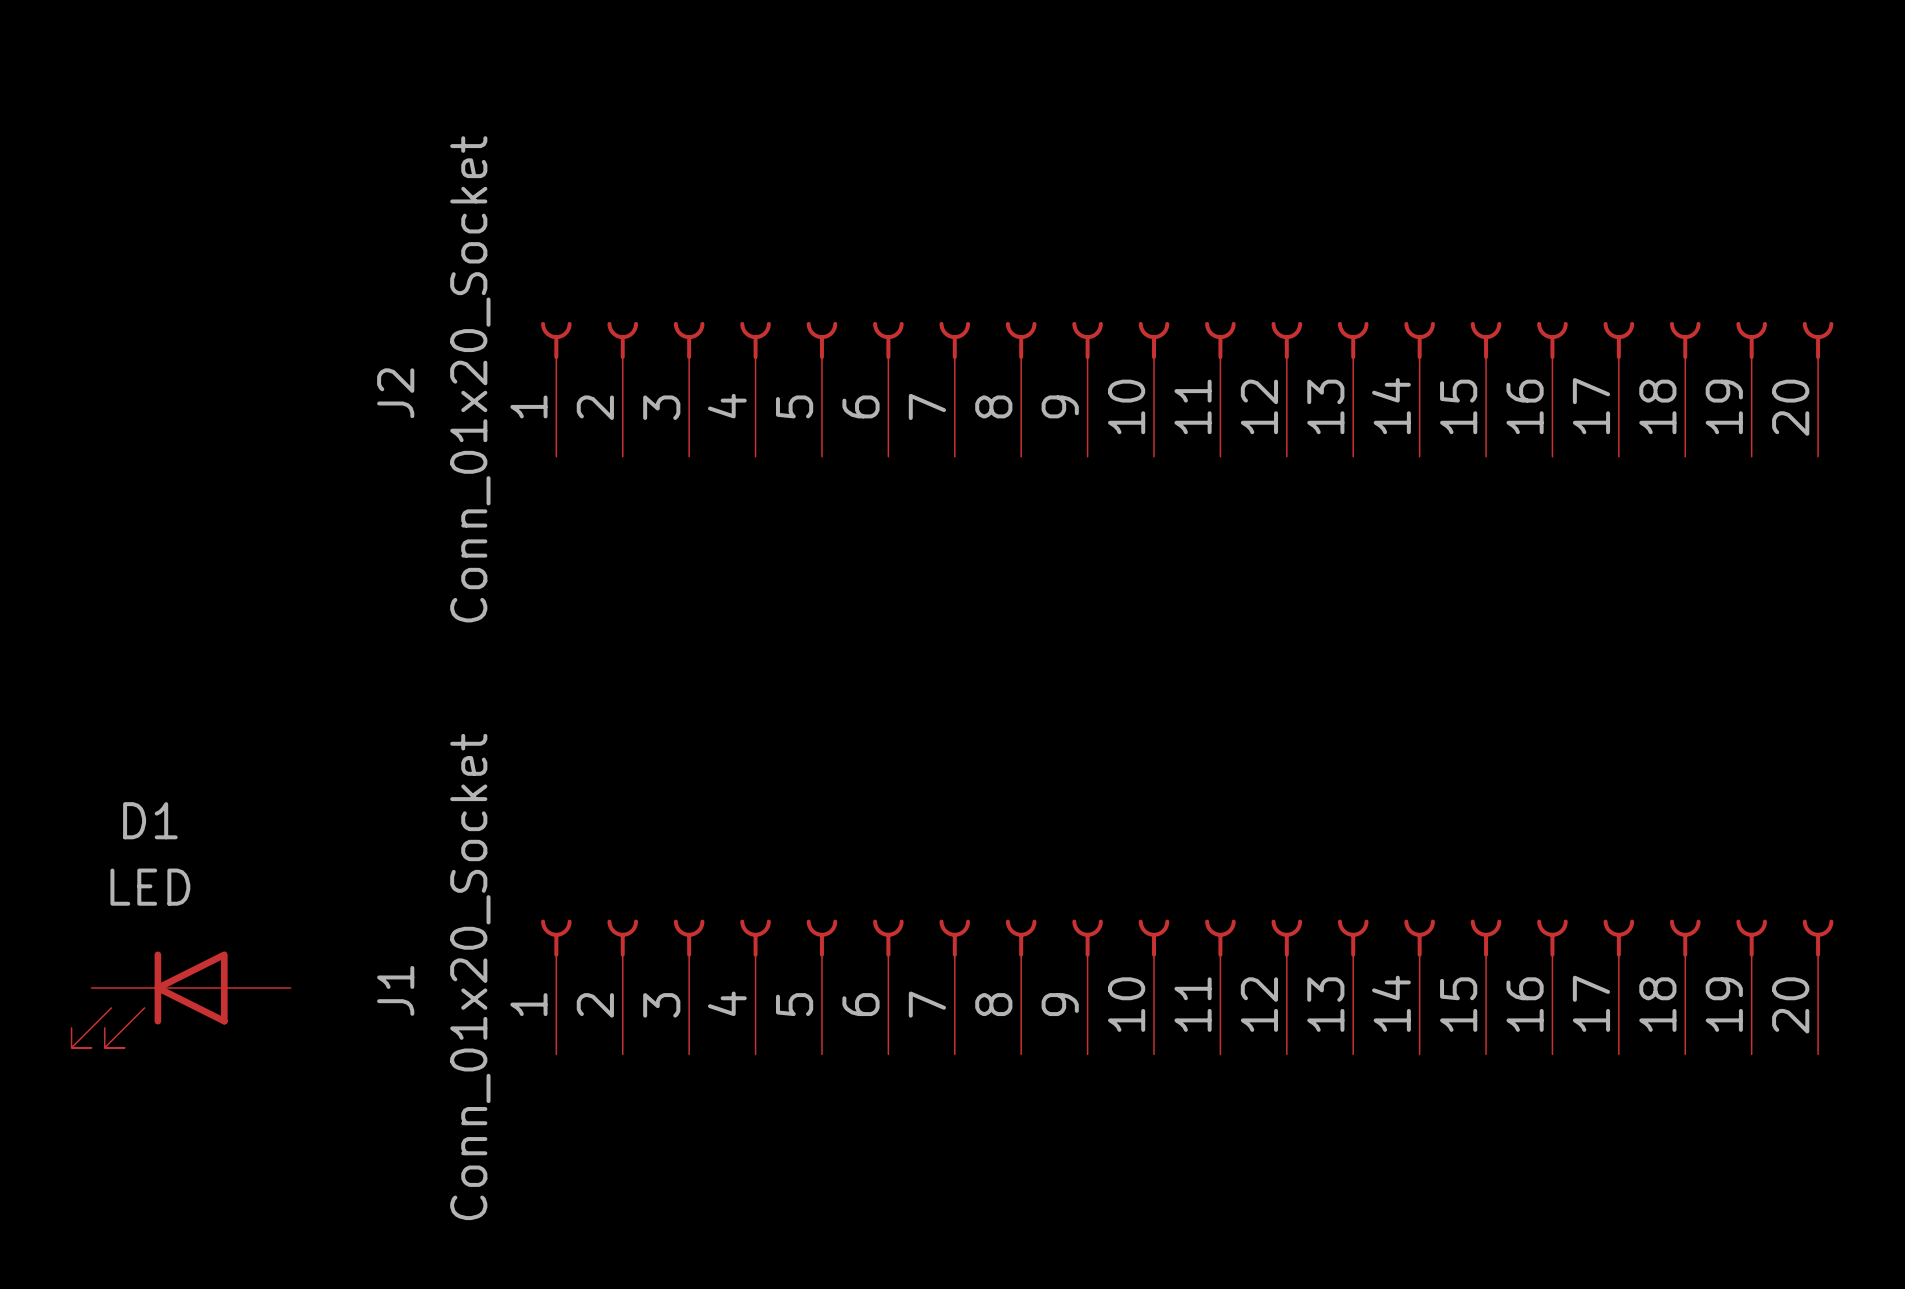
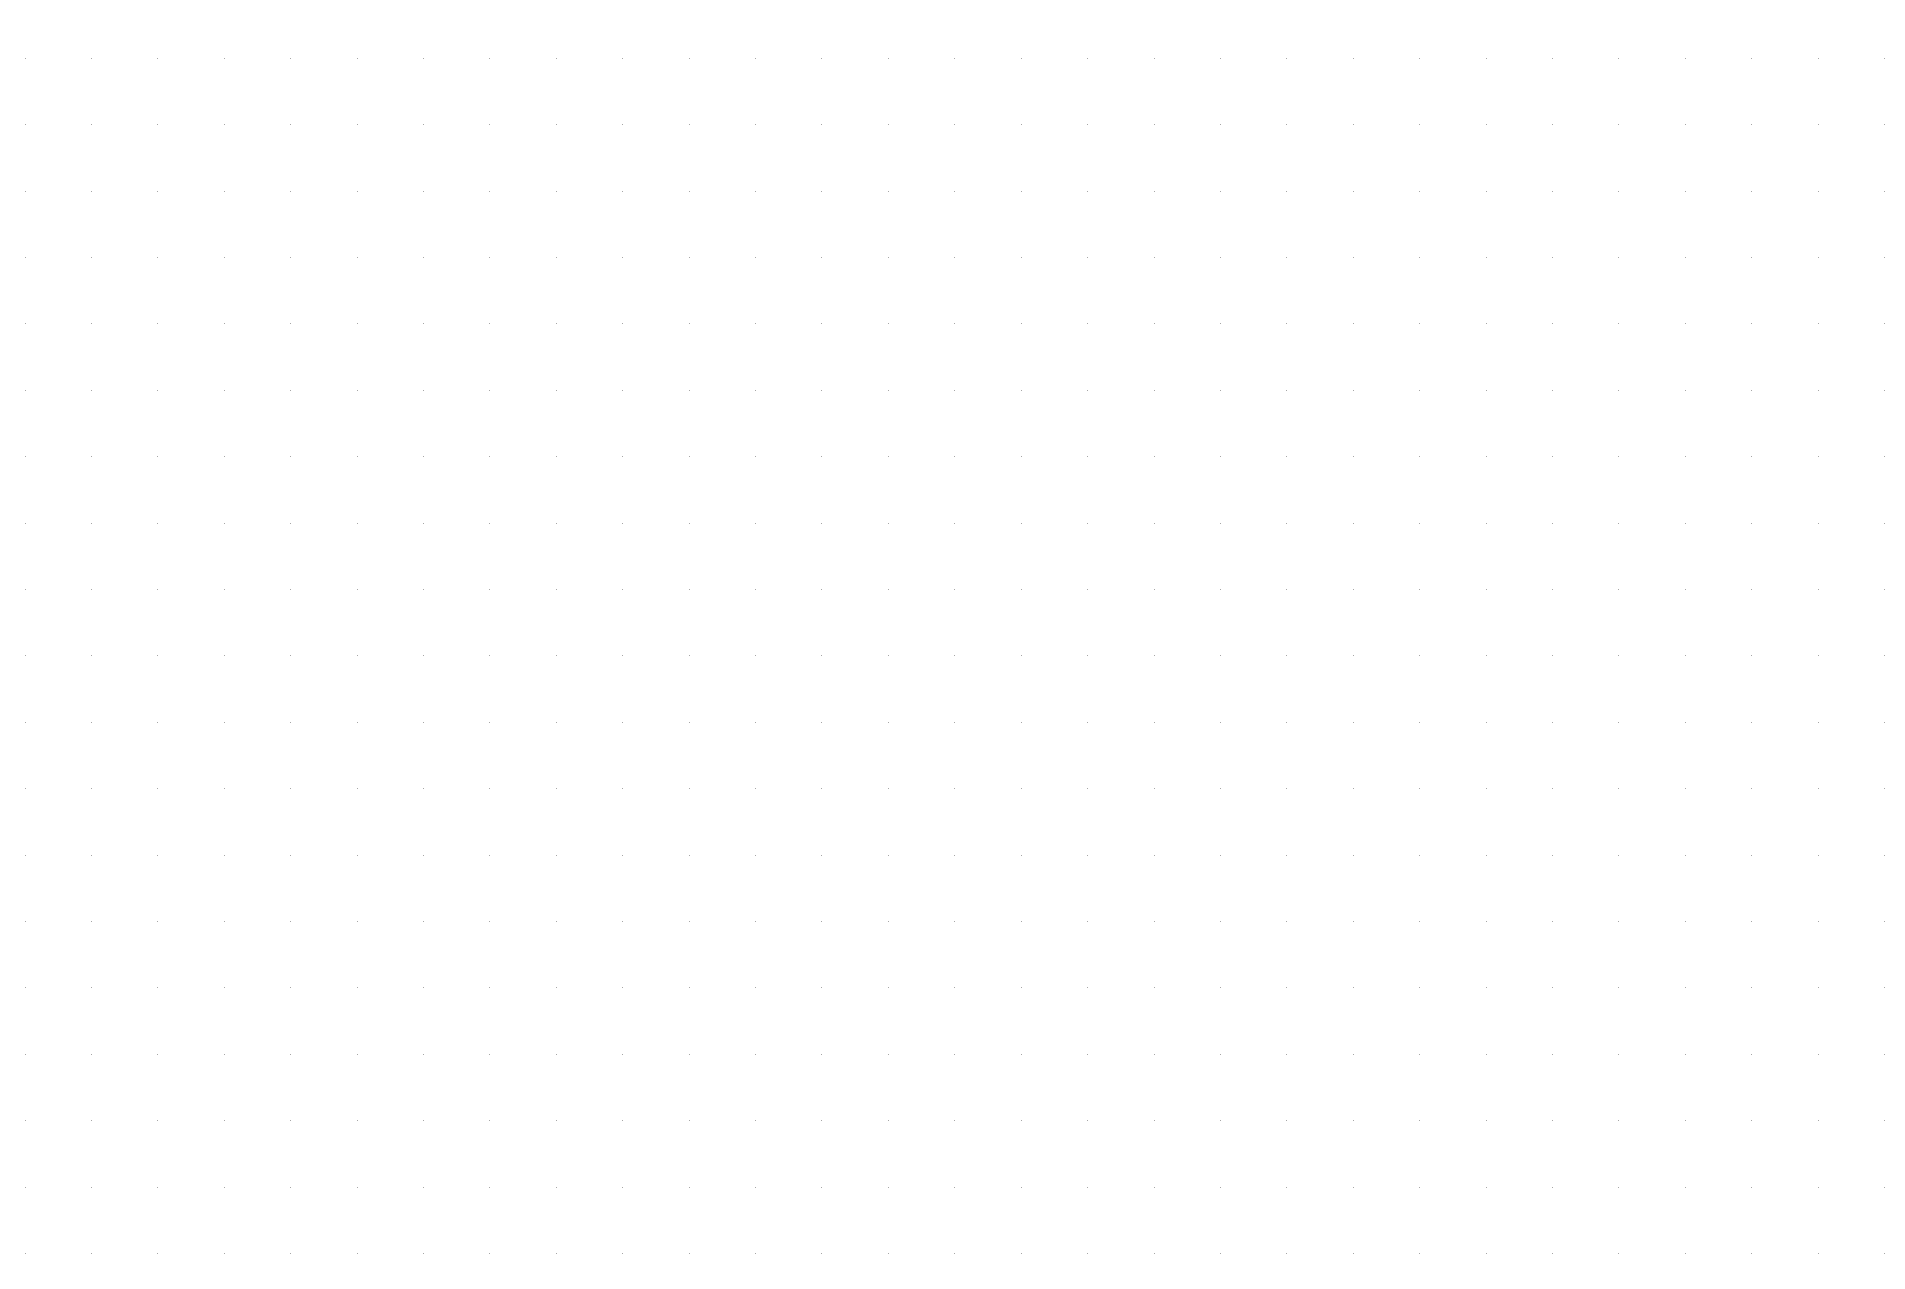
J2: Conn_01x20_Socket (1187, 389) -> none
J1: Conn_01x20_Socket (1187, 986) -> none
D1: LED (181, 999) -> none

